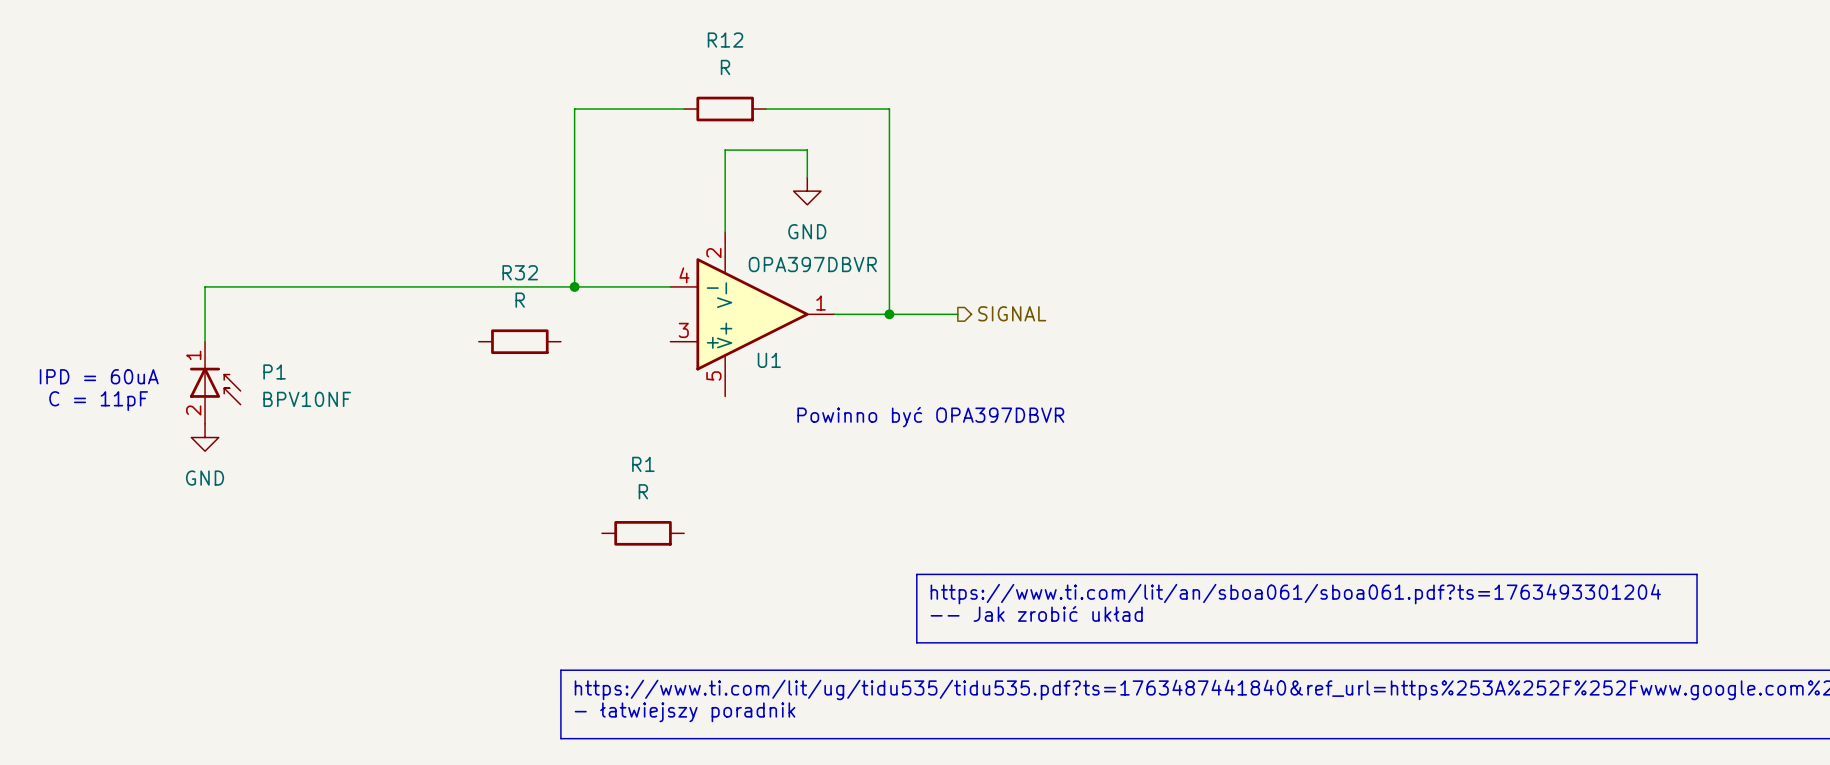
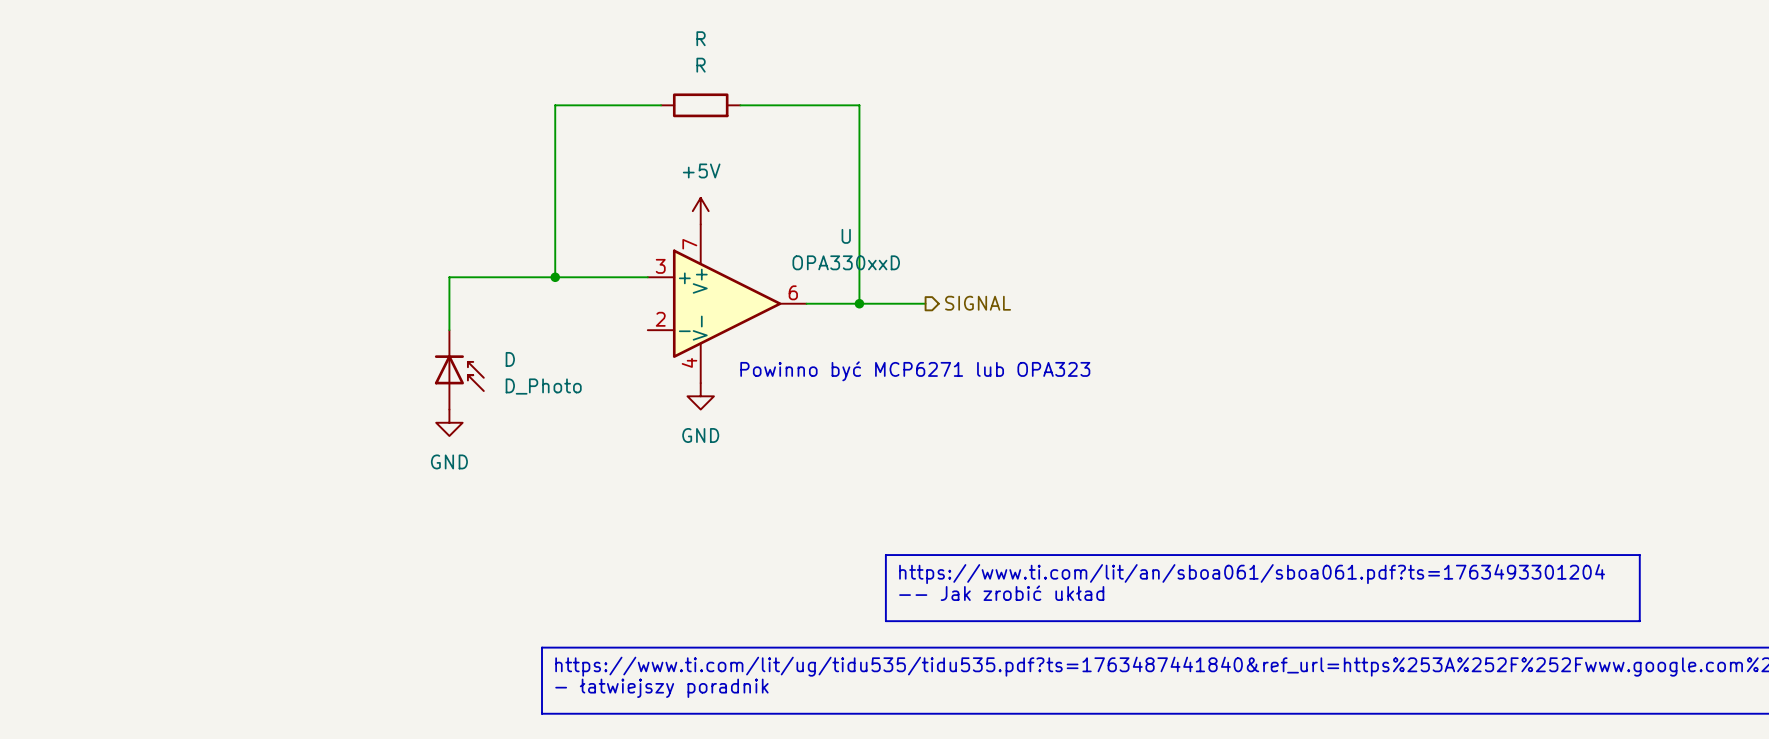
R12 name: R12 (725, 40) -> R (701, 38)
wire: (807, 177) (807, 150) (725, 150) (725, 232) -> none
power symbol: GND (807, 191) -> none
power symbol: none -> +5V (700, 211)
U1 symbol: [670, 232, 835, 397] -> [647, 224, 807, 384]
U1 value: OPA397DBVR (812, 264) -> OPA330xxD (846, 262)
wire: (465, 286) (205, 286) (205, 341) -> (449, 277) (449, 330)
R32: R (519, 341) -> none
U1 name: U1 (769, 360) -> U (846, 236)
text: IPD = 60uA (99, 376) -> none
P1: BPV10NF (215, 382) -> none
D: none -> D_Photo (459, 369)
text: none -> Powinno być MCP6271 lub OPA323 (915, 371)
text: C = 11pF (98, 401) -> none
power symbol: none -> GND (700, 396)
text: Powinno być OPA397DBVR (930, 417) -> none
power symbol: GND (205, 437) -> none
power symbol: none -> GND (449, 422)
R1: R (643, 533) -> none

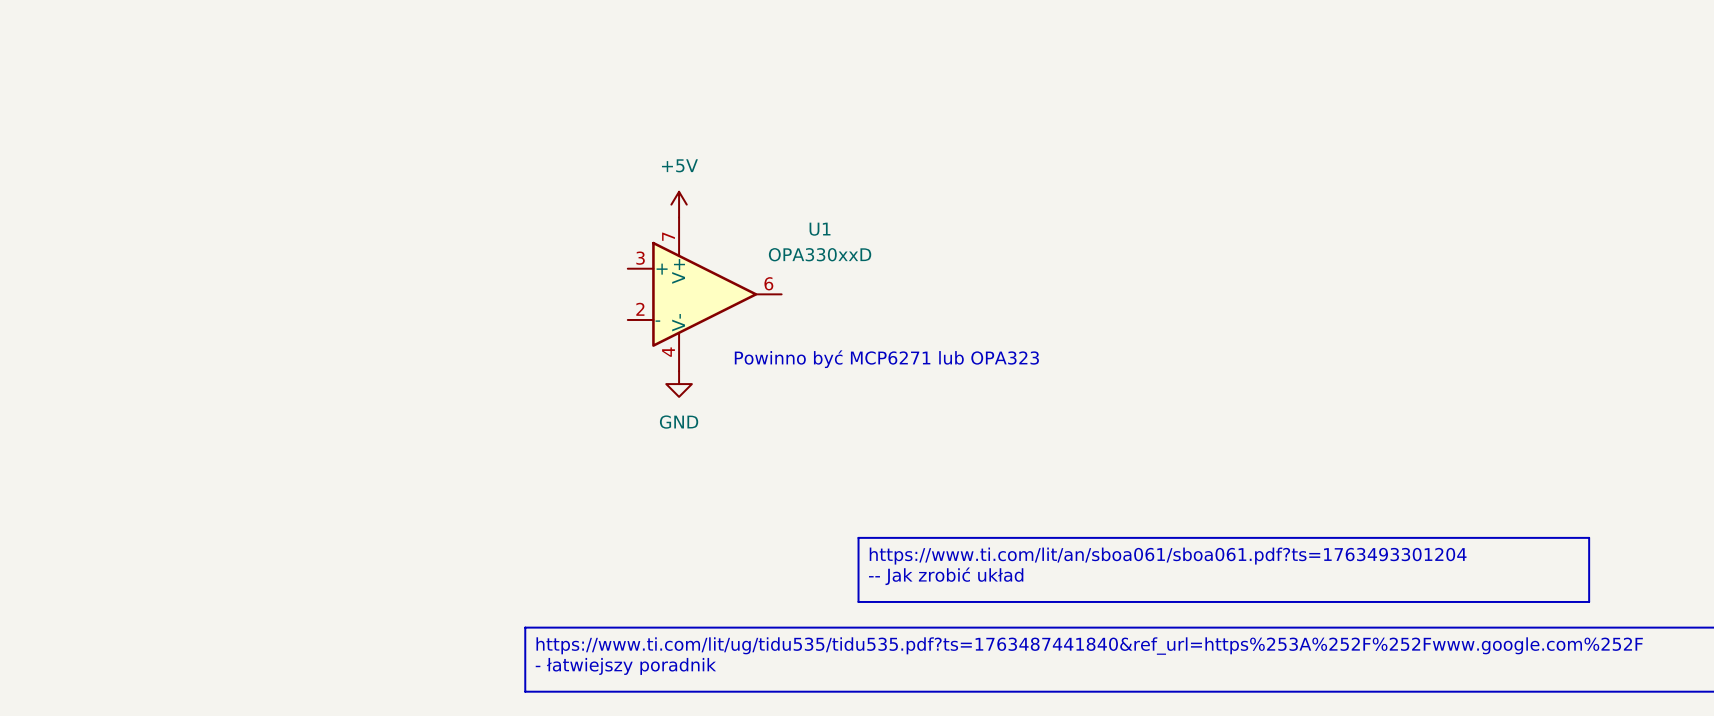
wire: (661, 105) (555, 105) (555, 277) -> none
R: R (700, 105) -> none
wire: (740, 105) (859, 105) (859, 303) -> none
U name: U (846, 236) -> U1 (820, 229)
junction: (555, 277) -> none
wire: (647, 277) (449, 277) (449, 330) -> none
wire: (806, 303) (925, 303) -> none
junction: (859, 303) -> none
hierarchical label: SIGNAL (978, 303) -> none
D: D_Photo (459, 369) -> none
power symbol: GND (449, 422) -> none

